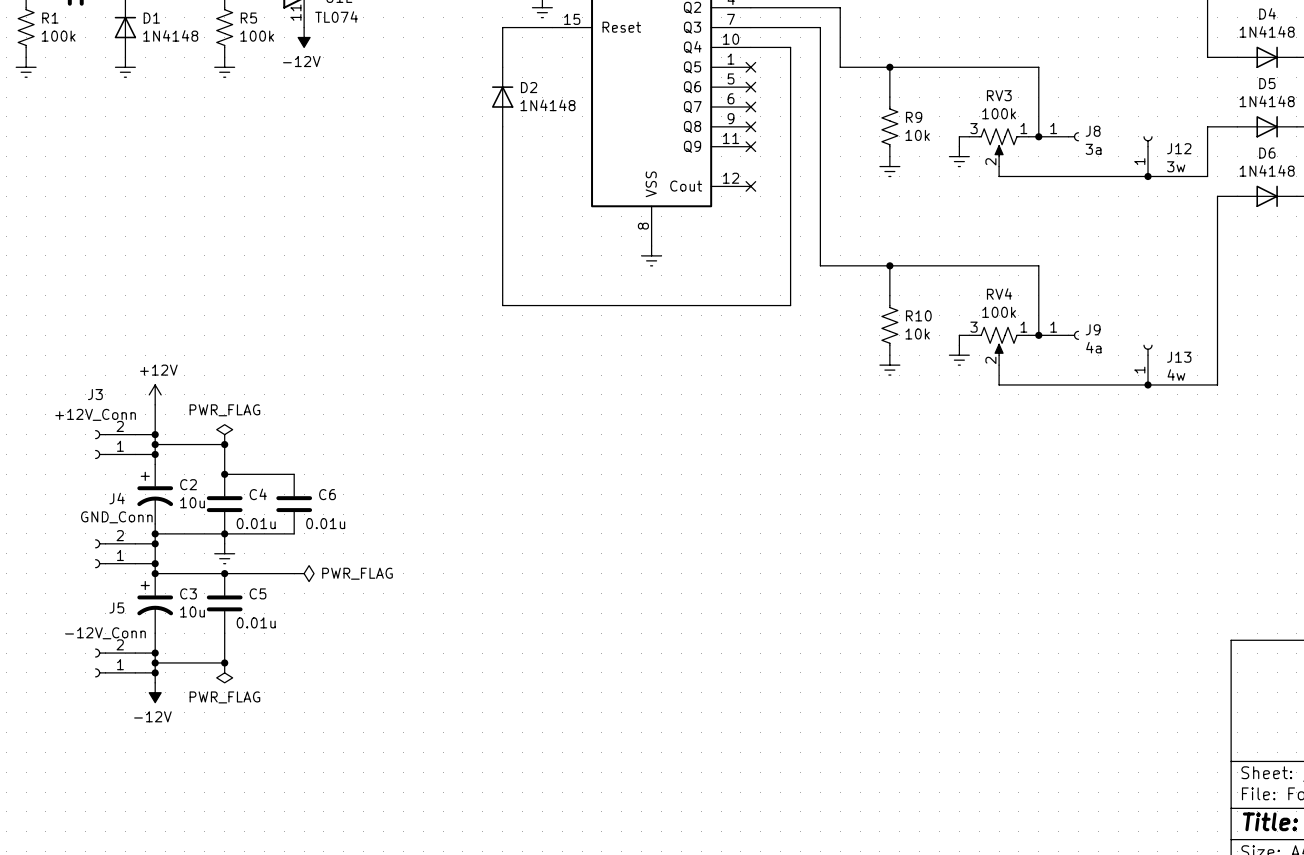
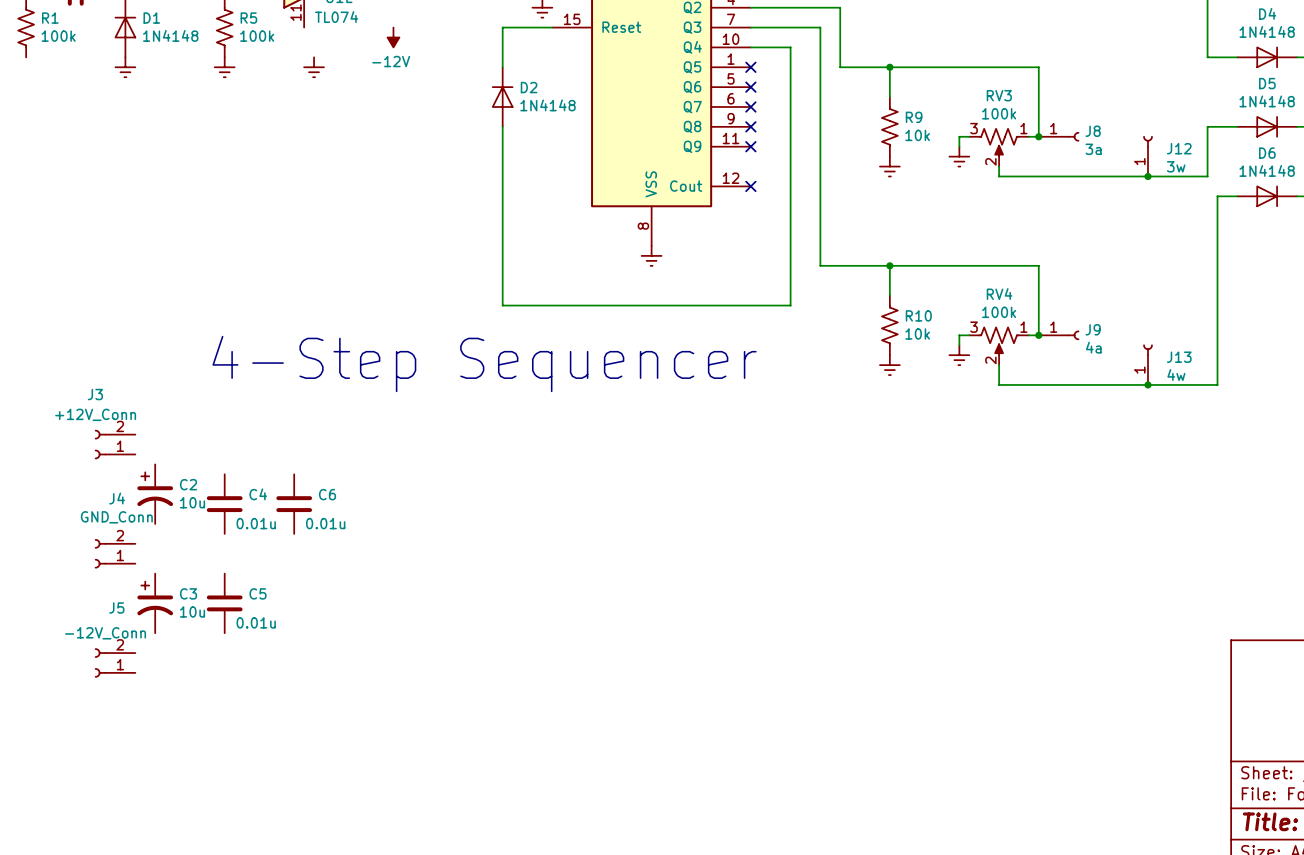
power symbol position: -12V (304, 37) -> -12V (393, 37)
power symbol: (26, 67) -> none
power symbol: none -> (314, 67)
text: none -> 4-Step Sequencer (484, 363)
power symbol: +12V (155, 394) -> none
wire: (155, 404) (155, 464) -> none
wire: (135, 434) (155, 434) -> none
junction: (155, 434) -> none
power symbol: PWR_FLAG (224, 434) -> none
wire: (155, 444) (224, 444) (224, 474) (294, 474) -> none
junction: (155, 444) -> none
junction: (224, 444) -> none
wire: (135, 454) (155, 454) -> none
junction: (155, 454) -> none
junction: (224, 474) -> none
wire: (155, 523) (155, 573) (294, 573) -> none
wire: (155, 533) (294, 533) -> none
junction: (155, 533) -> none
wire: (224, 533) (224, 543) -> none
junction: (224, 533) -> none
wire: (135, 543) (155, 543) -> none
junction: (155, 543) -> none
power symbol: (224, 553) -> none
wire: (135, 563) (155, 563) -> none
junction: (155, 563) -> none
junction: (155, 573) -> none
junction: (224, 573) -> none
power symbol: PWR_FLAG (304, 573) -> none
wire: (155, 633) (155, 682) -> none
wire: (224, 633) (224, 662) (155, 662) -> none
wire: (135, 653) (155, 653) -> none
junction: (155, 653) -> none
junction: (155, 662) -> none
junction: (224, 662) -> none
wire: (135, 672) (155, 672) -> none
junction: (155, 672) -> none
power symbol: PWR_FLAG (224, 672) -> none
power symbol: -12V (155, 692) -> none

